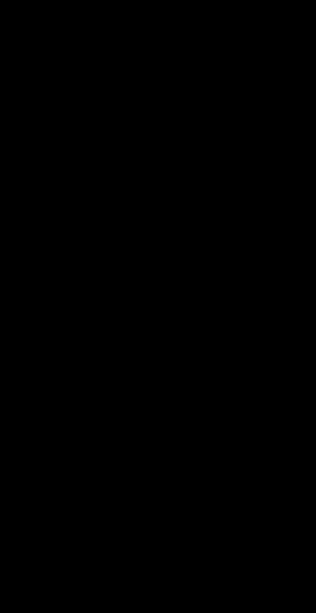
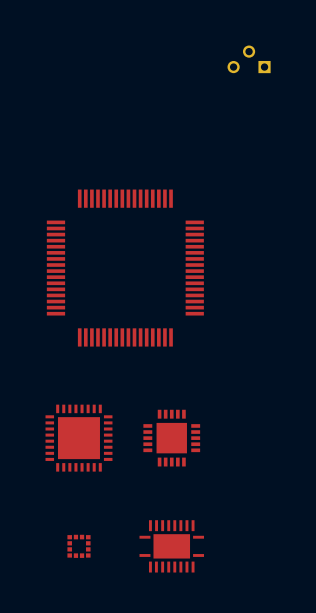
part: none -> (249, 59)
part: none -> (125, 268)
part: none -> (78, 438)
part: none -> (171, 438)
part: none -> (78, 546)
part: none -> (171, 546)

